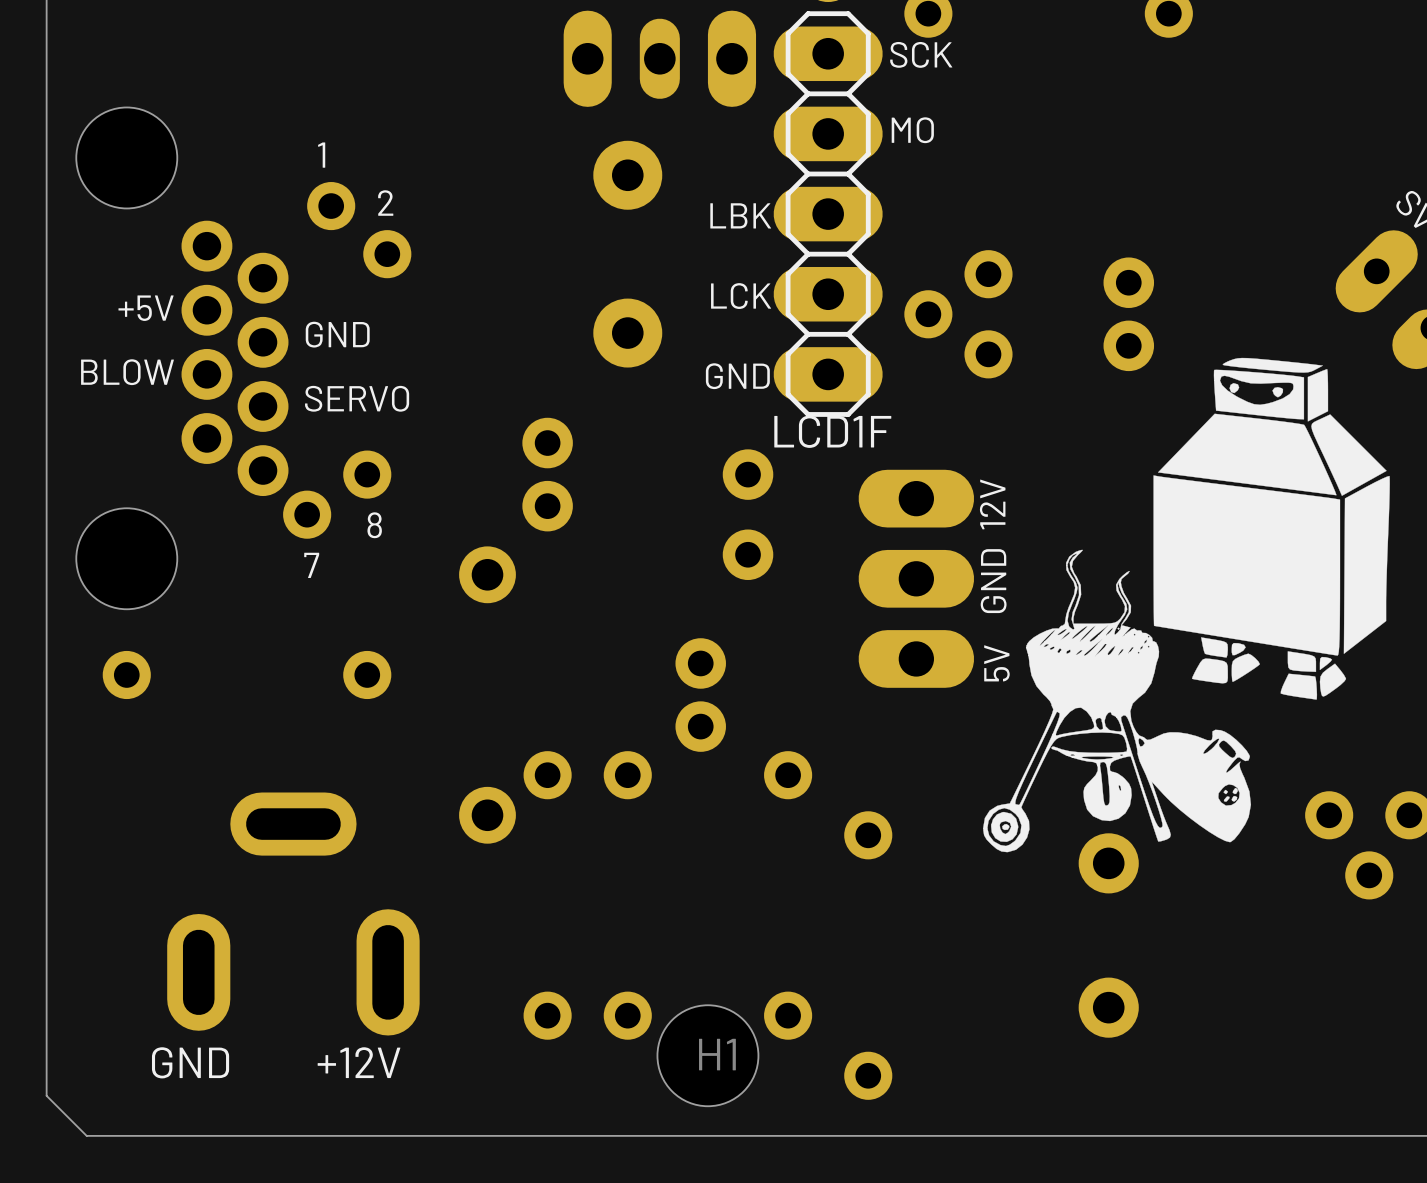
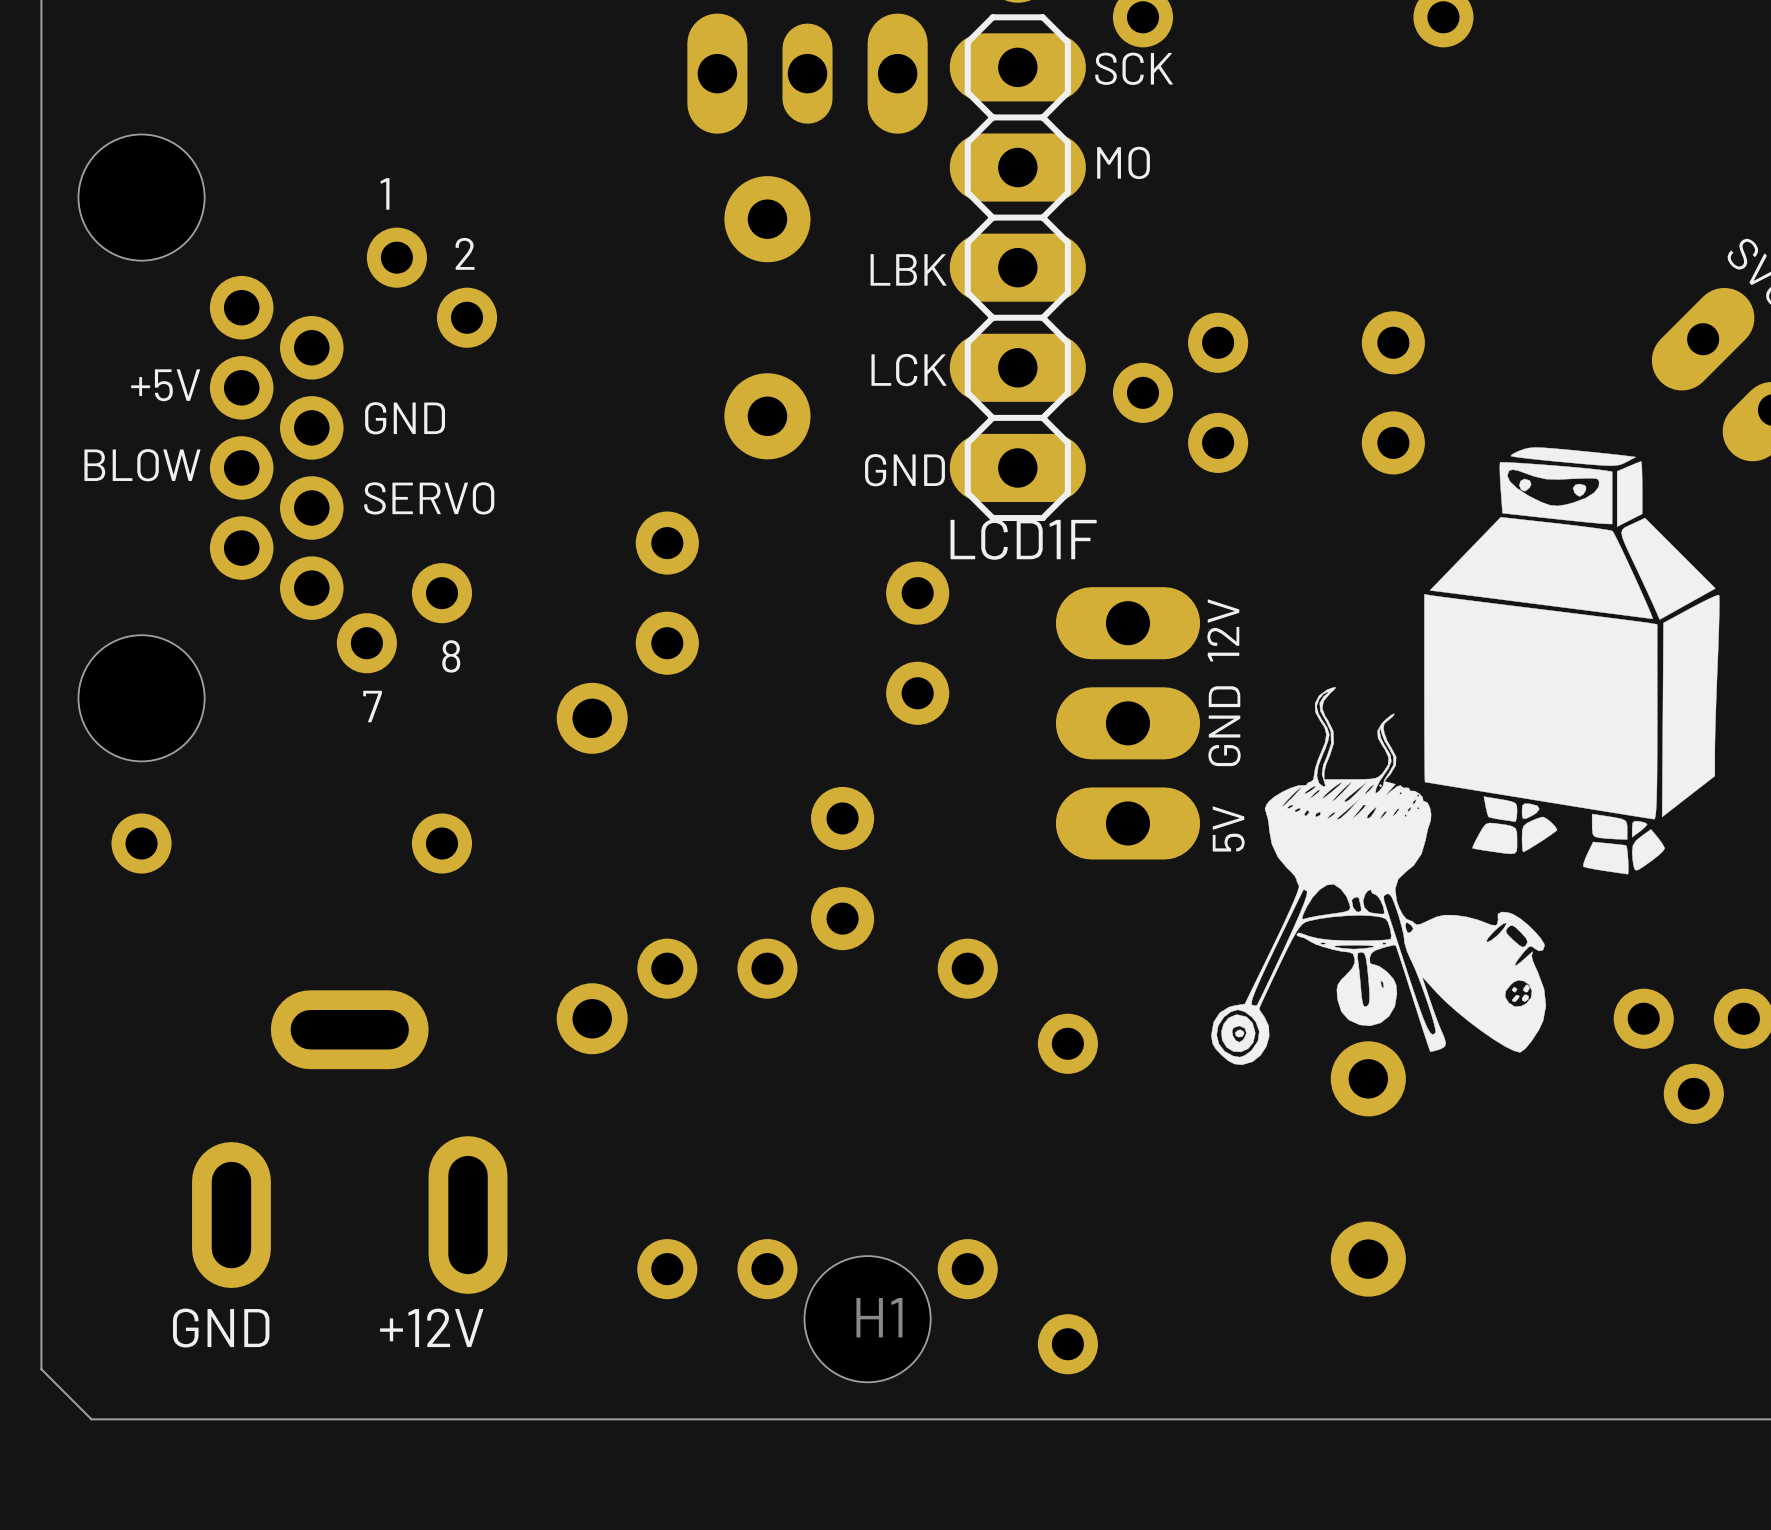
part footprint: [1103, 257, 1155, 372] -> [1361, 311, 1425, 475]
part footprint: [522, 417, 573, 532] -> [635, 511, 699, 675]
part footprint: [675, 638, 726, 752] -> [811, 786, 875, 951]

